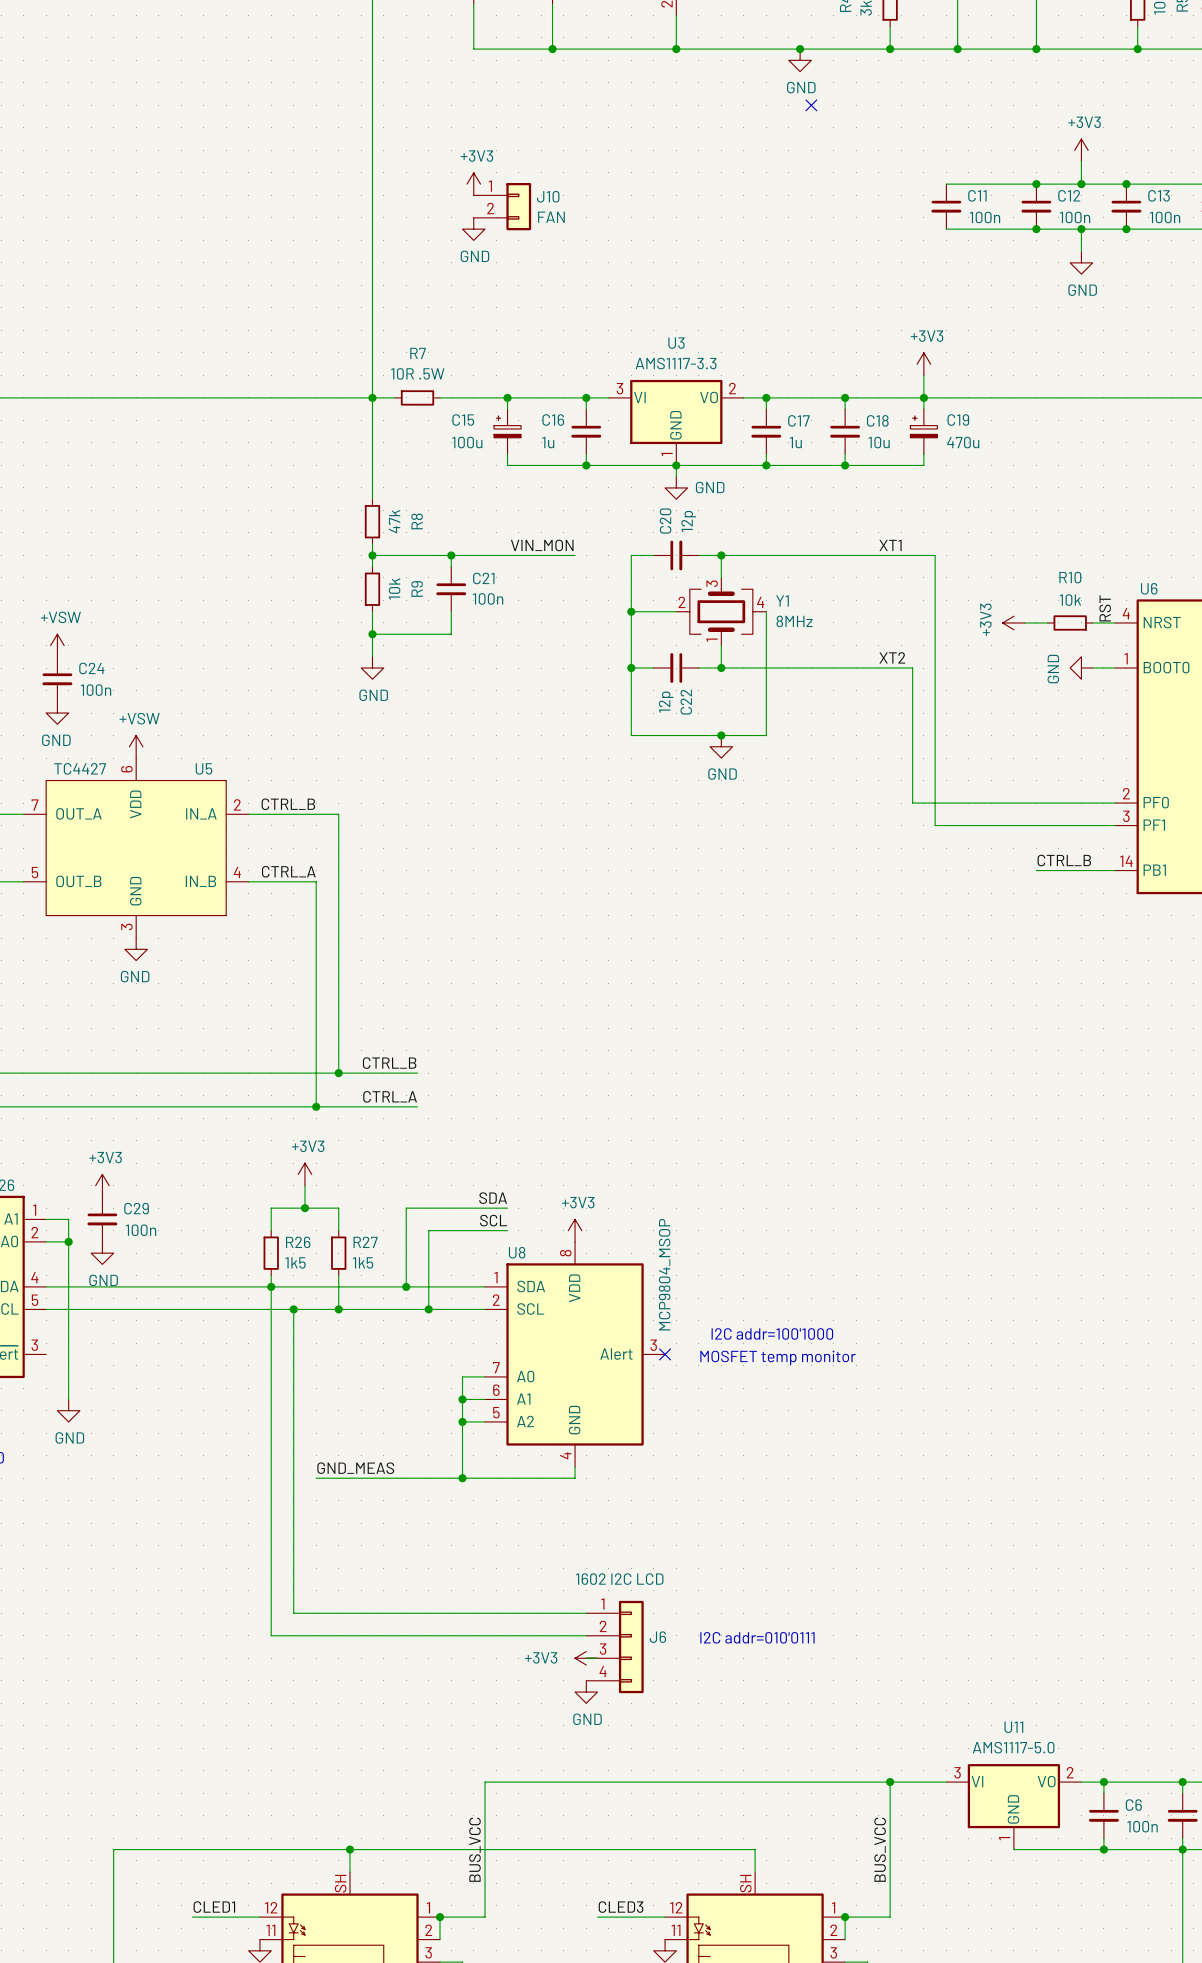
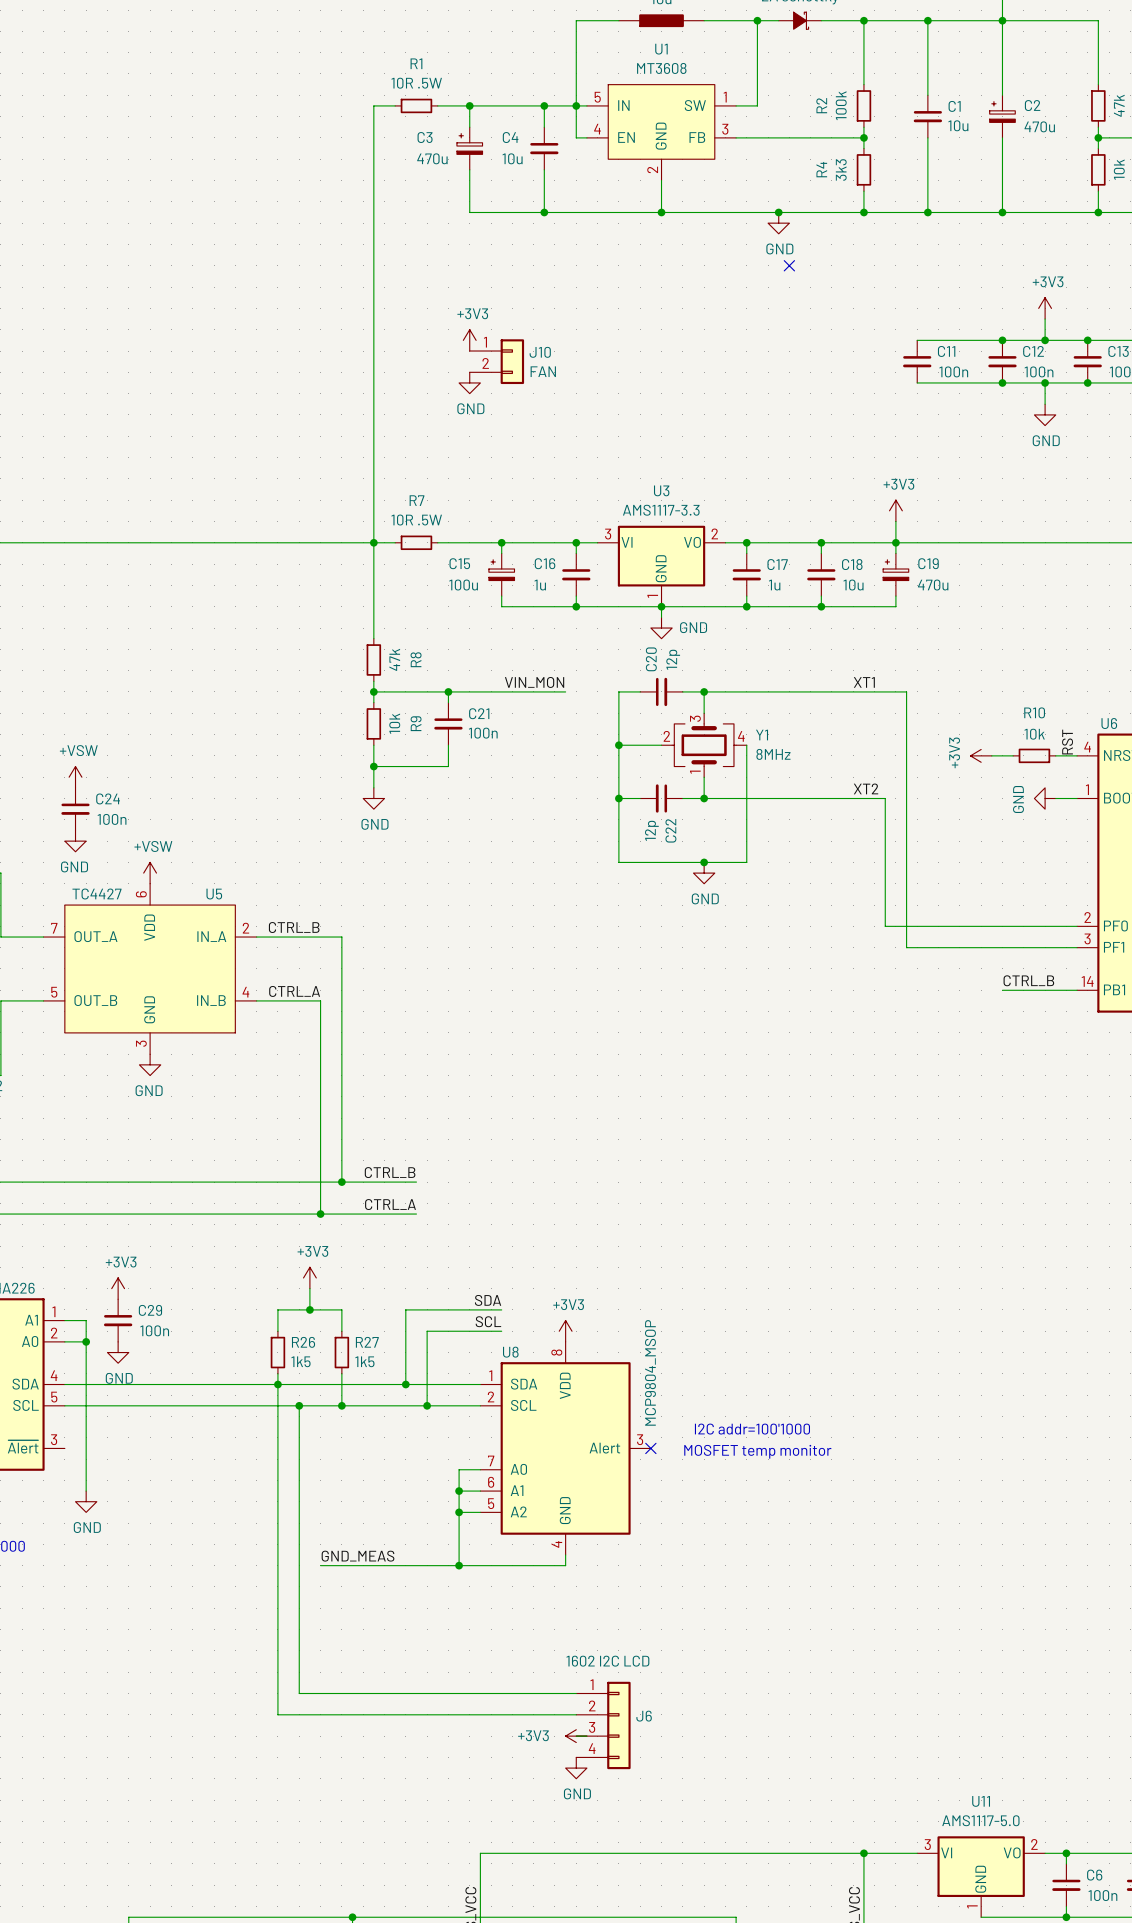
text: I2C addr=010'0111 (757, 1637) -> none

